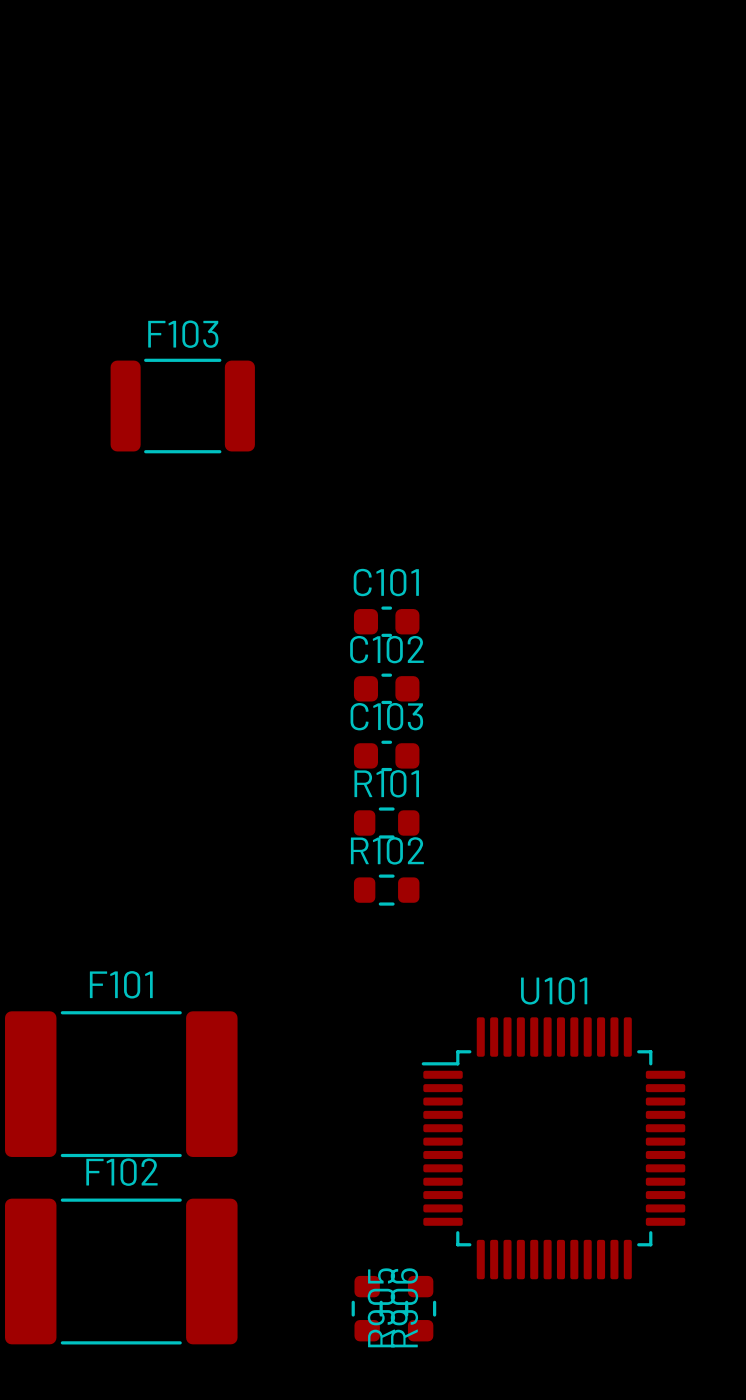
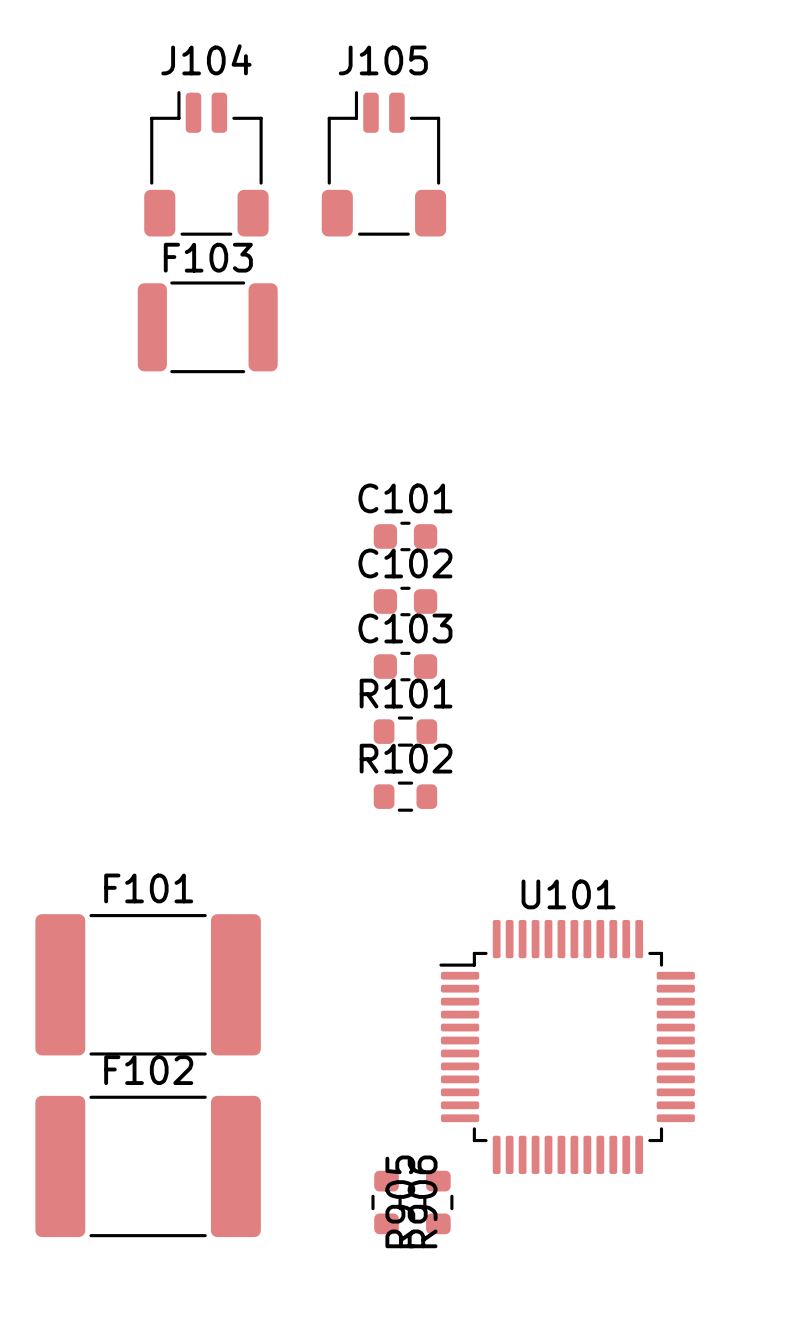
J104: none -> (206, 163)
J105: none -> (383, 163)

